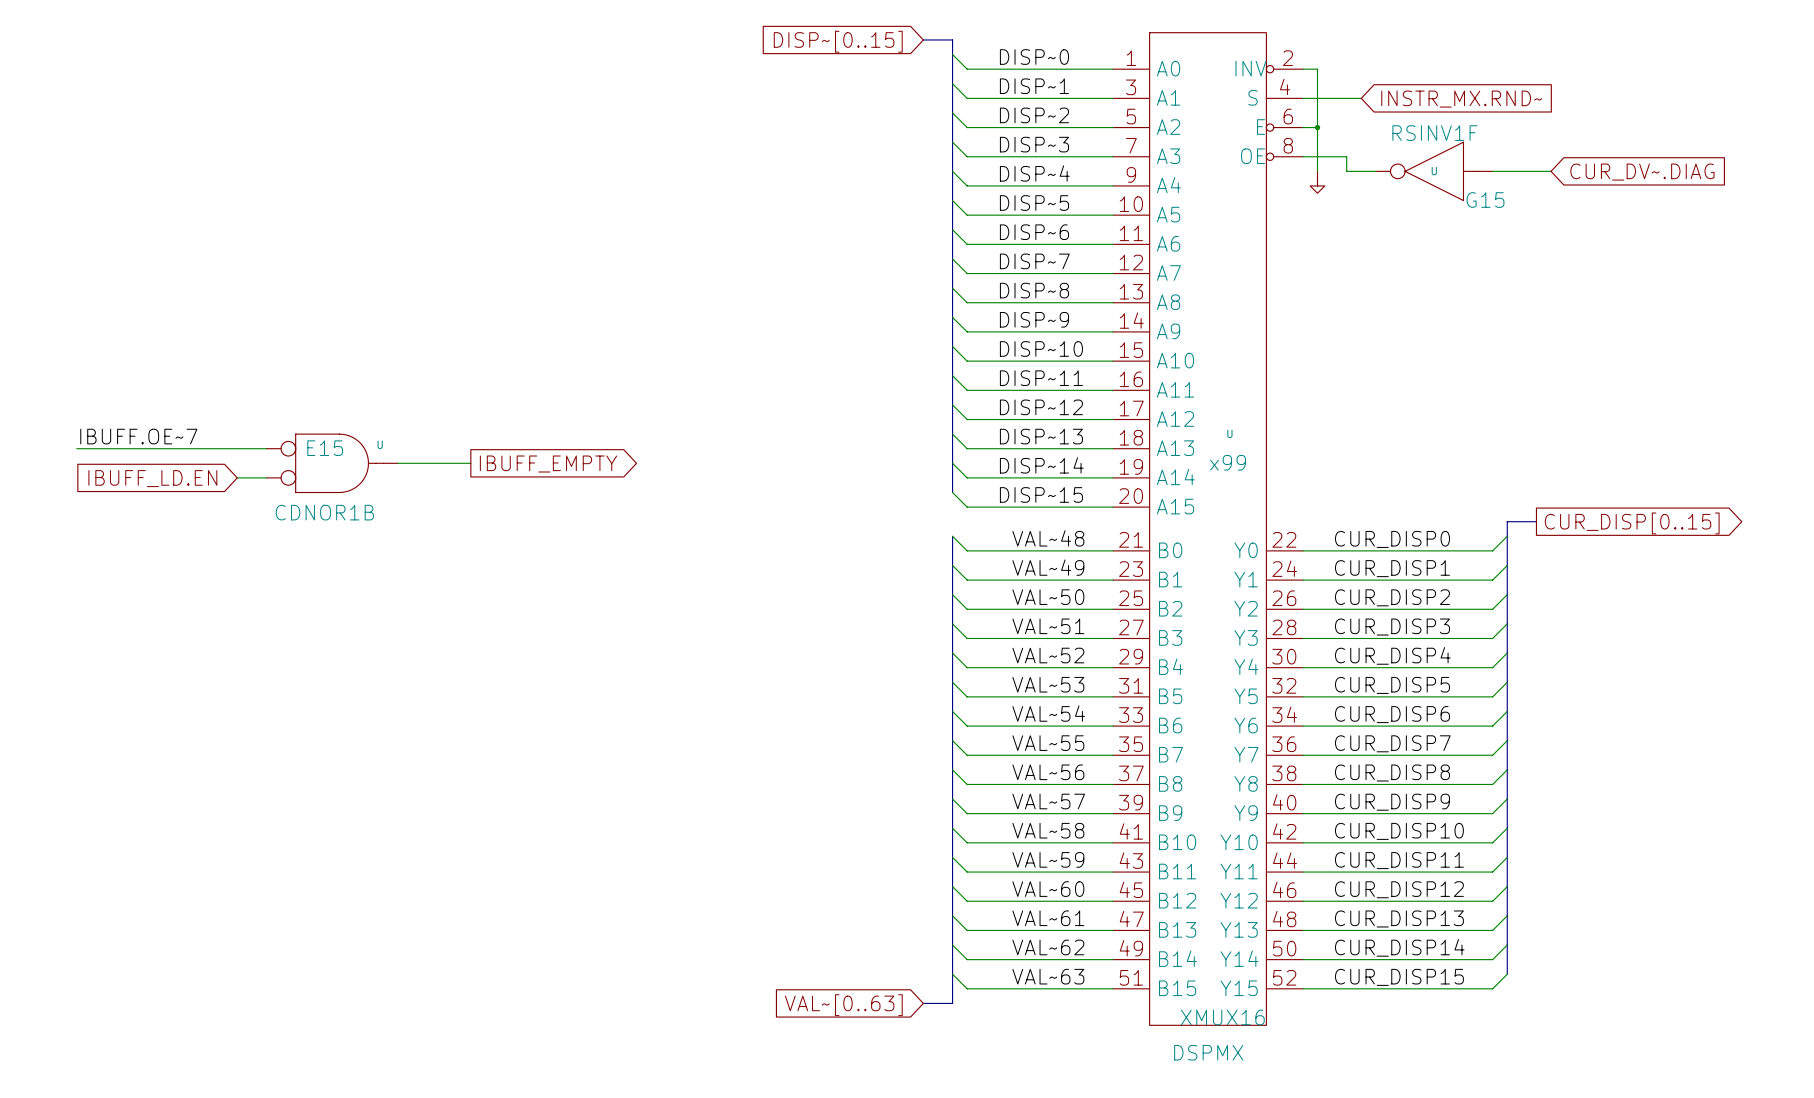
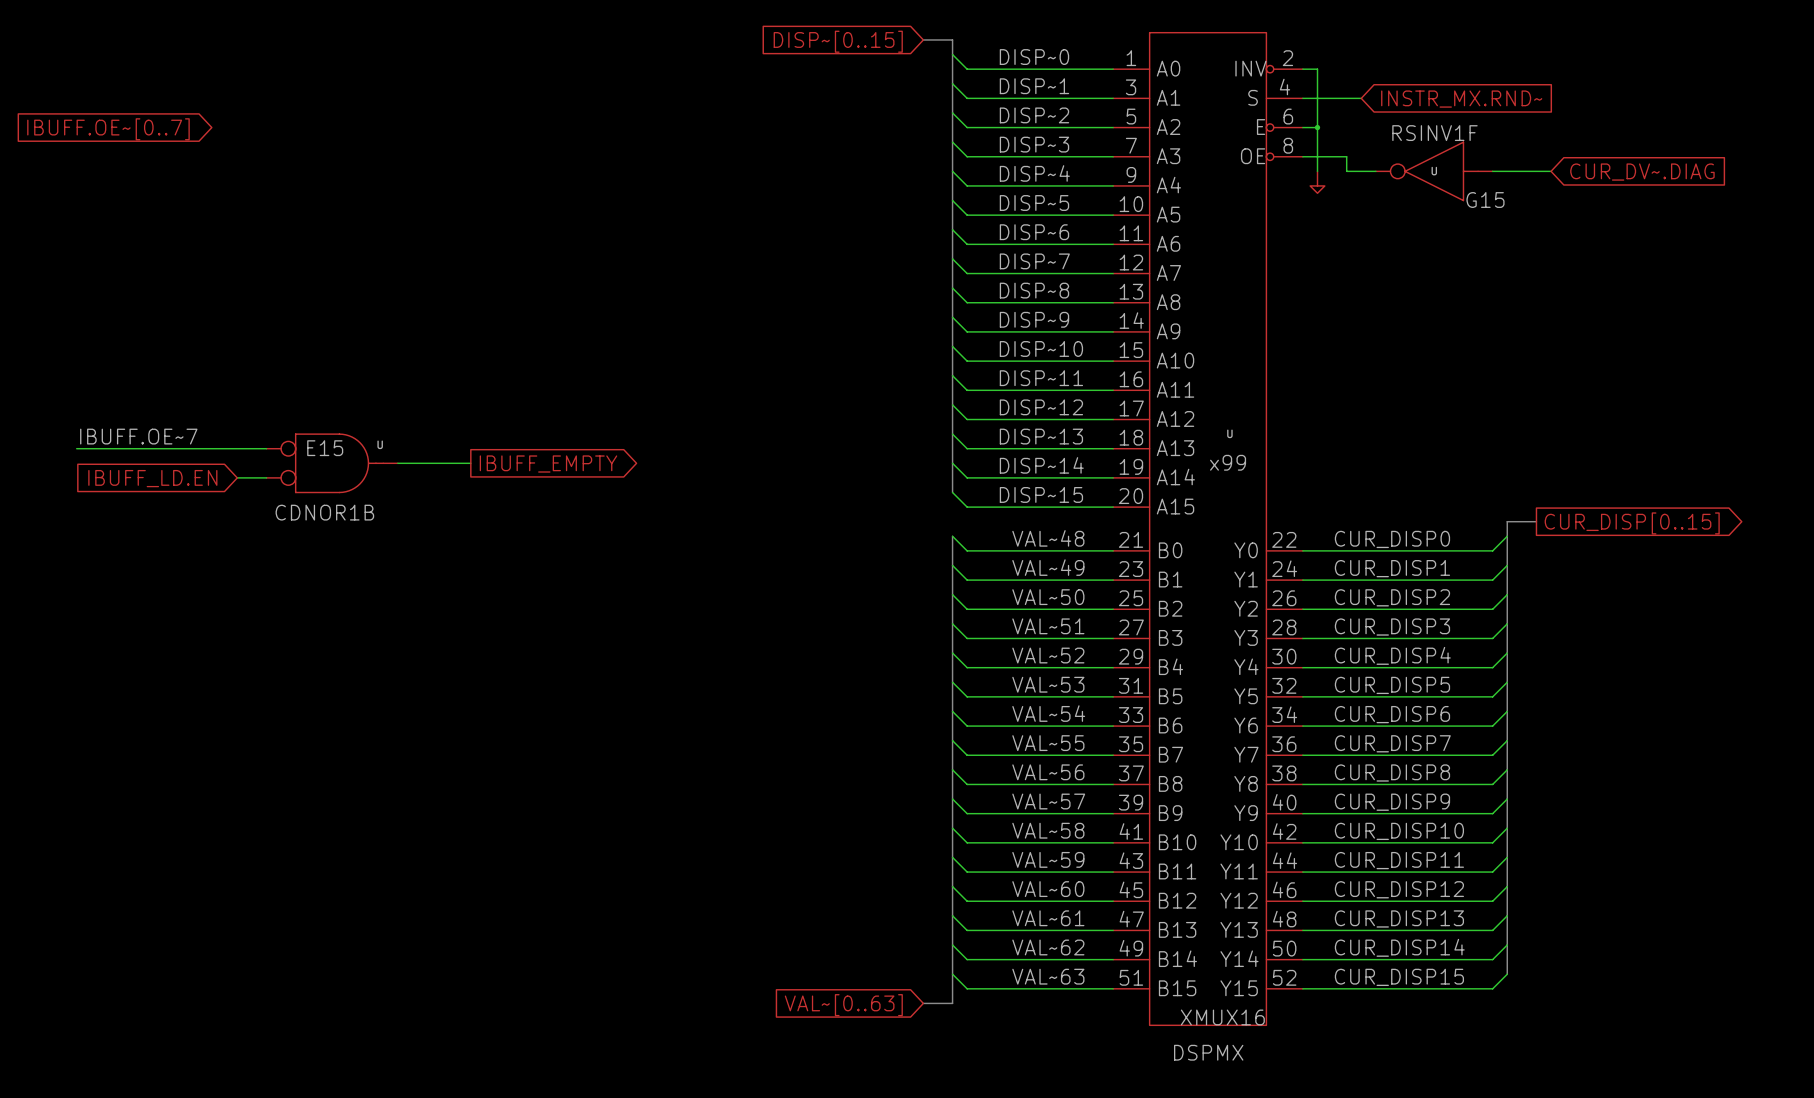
global label: none -> IBUFF.OE~[0..7] (108, 129)

